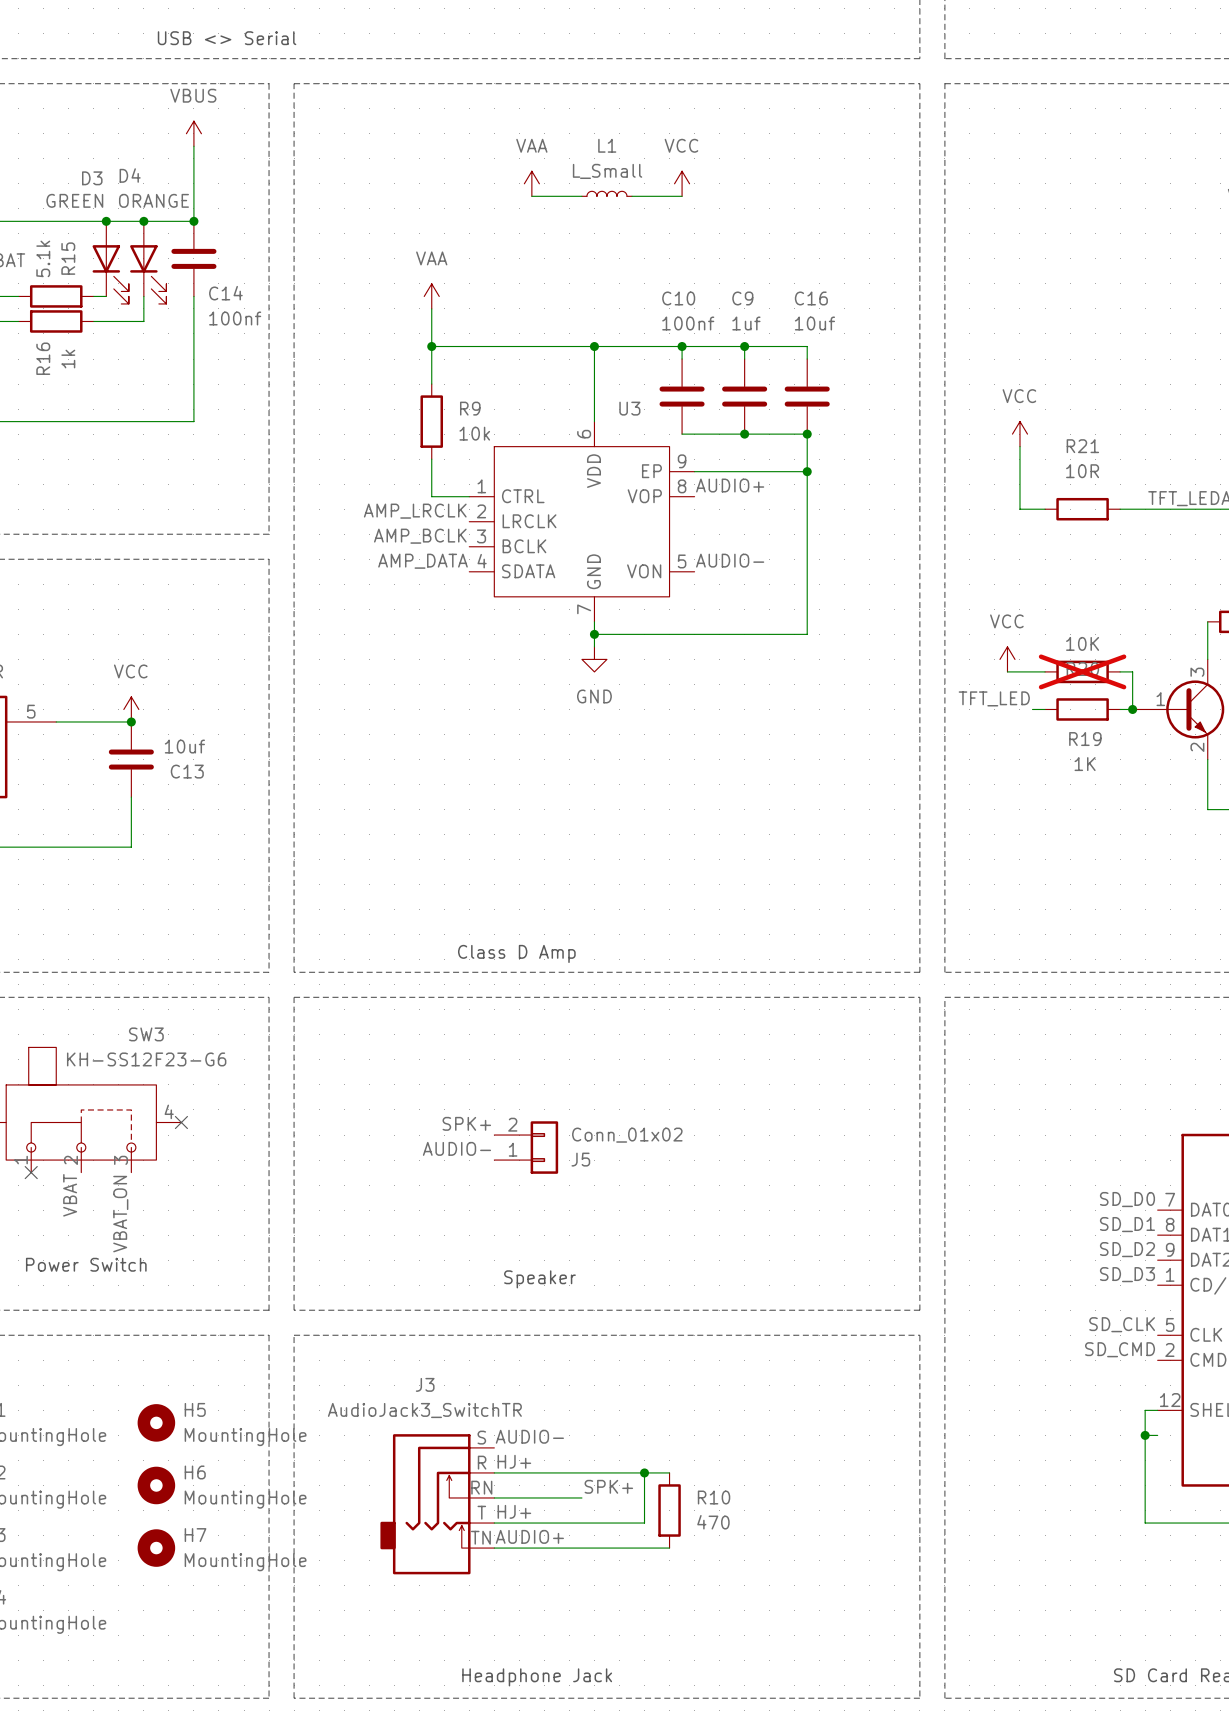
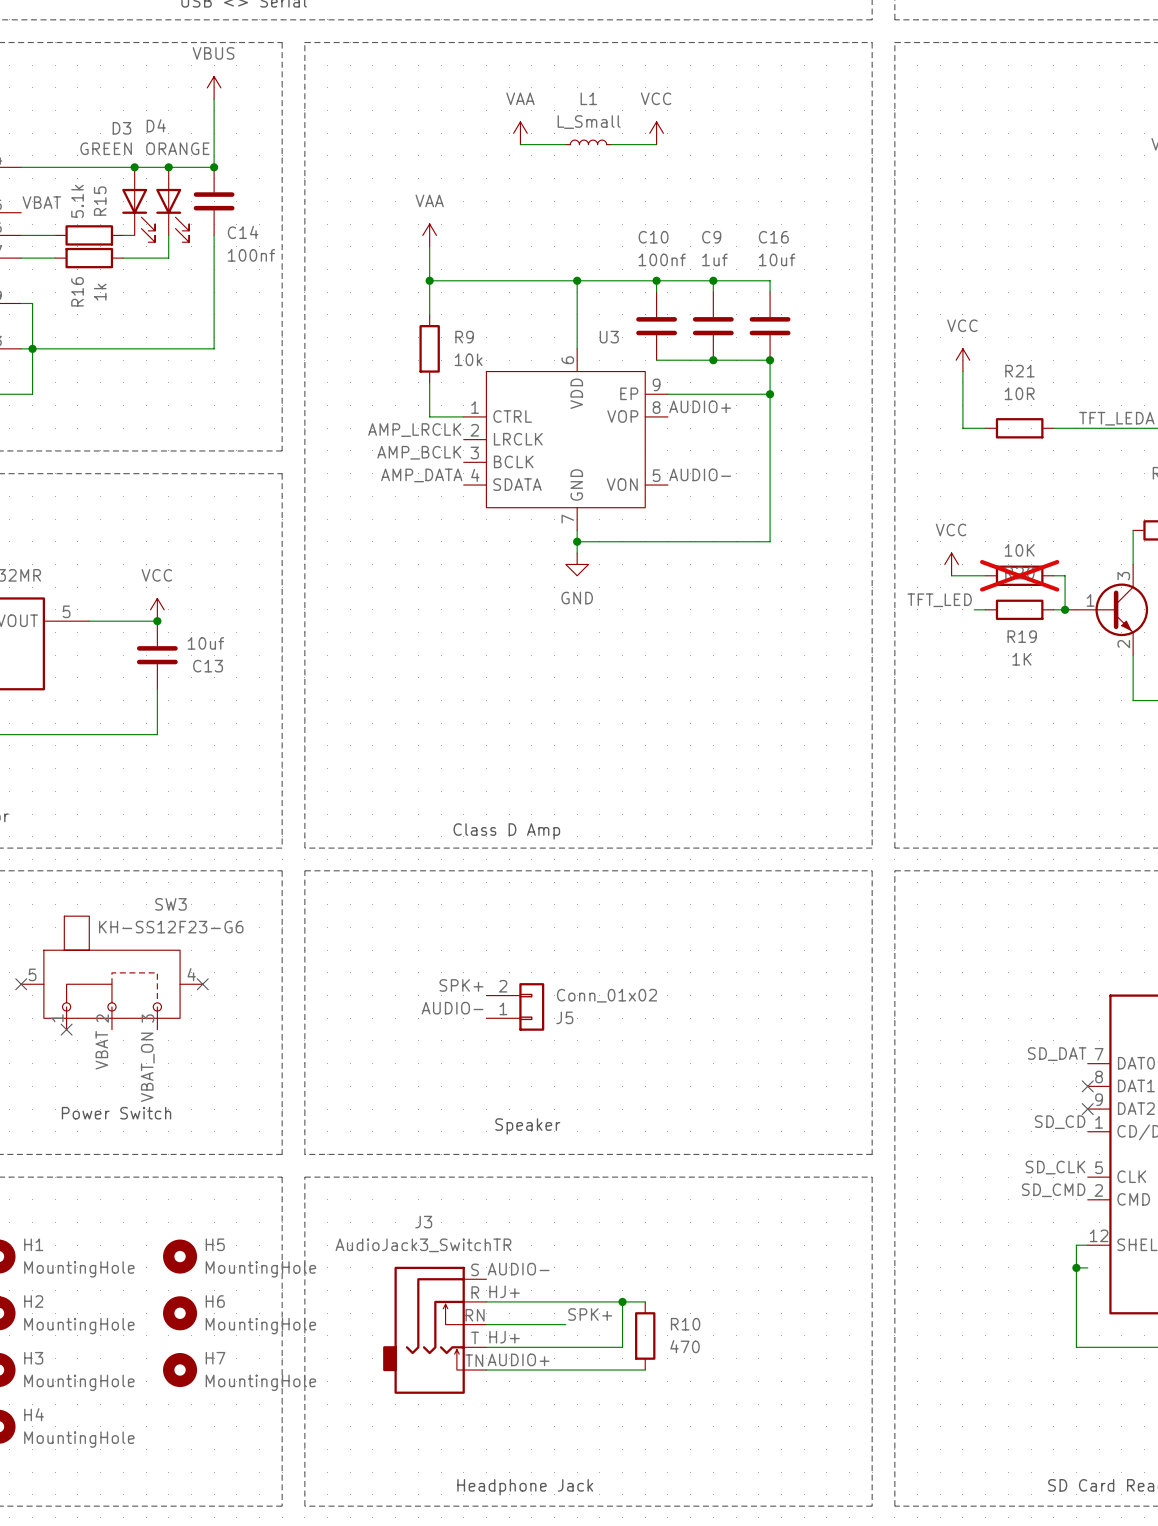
label: SD_D0 (1127, 1199) -> SD_DAT (1057, 1054)
label: SD_D1 (1127, 1224) -> none
no-connect mark: none -> (1087, 1086)
label: SD_D2 (1127, 1249) -> none
no-connect mark: none -> (1087, 1109)
label: SD_D3 (1127, 1274) -> SD_CD (1060, 1122)

